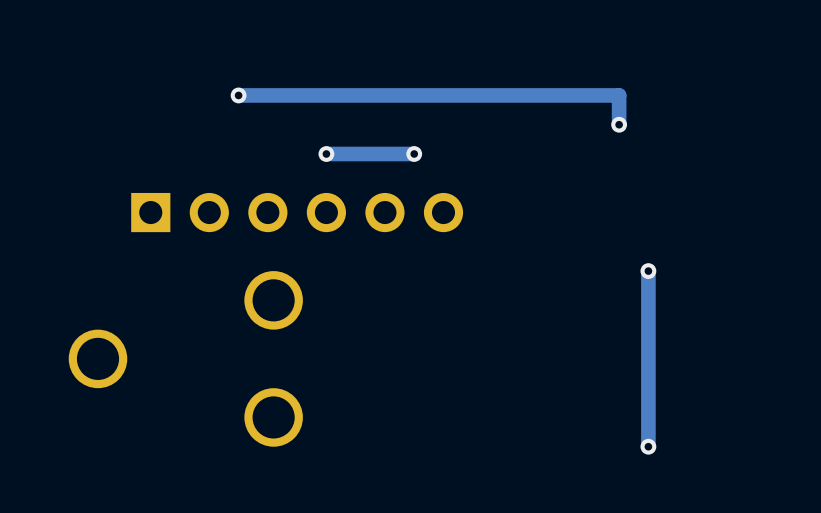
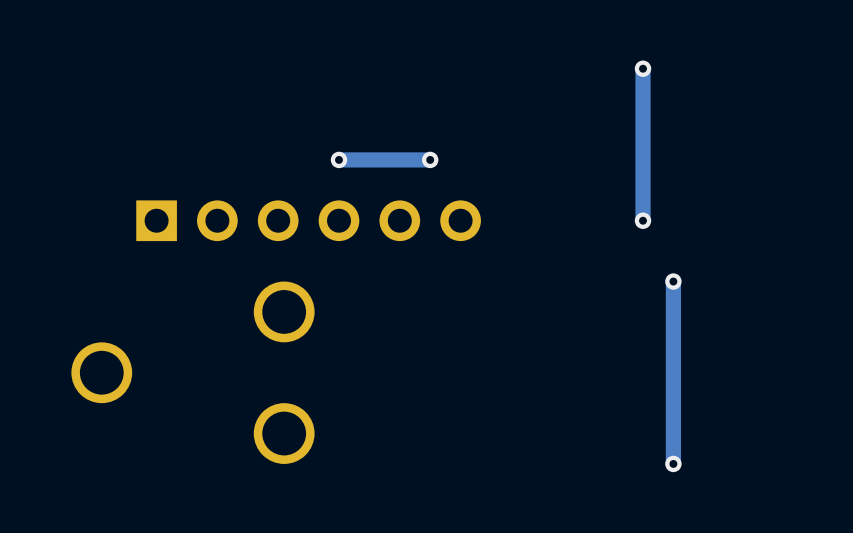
via: none -> (643, 68)
via: (238, 95) -> none
track: (619, 95) (238, 95) -> (643, 99) (643, 68)
track: none -> (643, 129) (643, 220)
via: (619, 124) -> none
via: none -> (643, 220)

